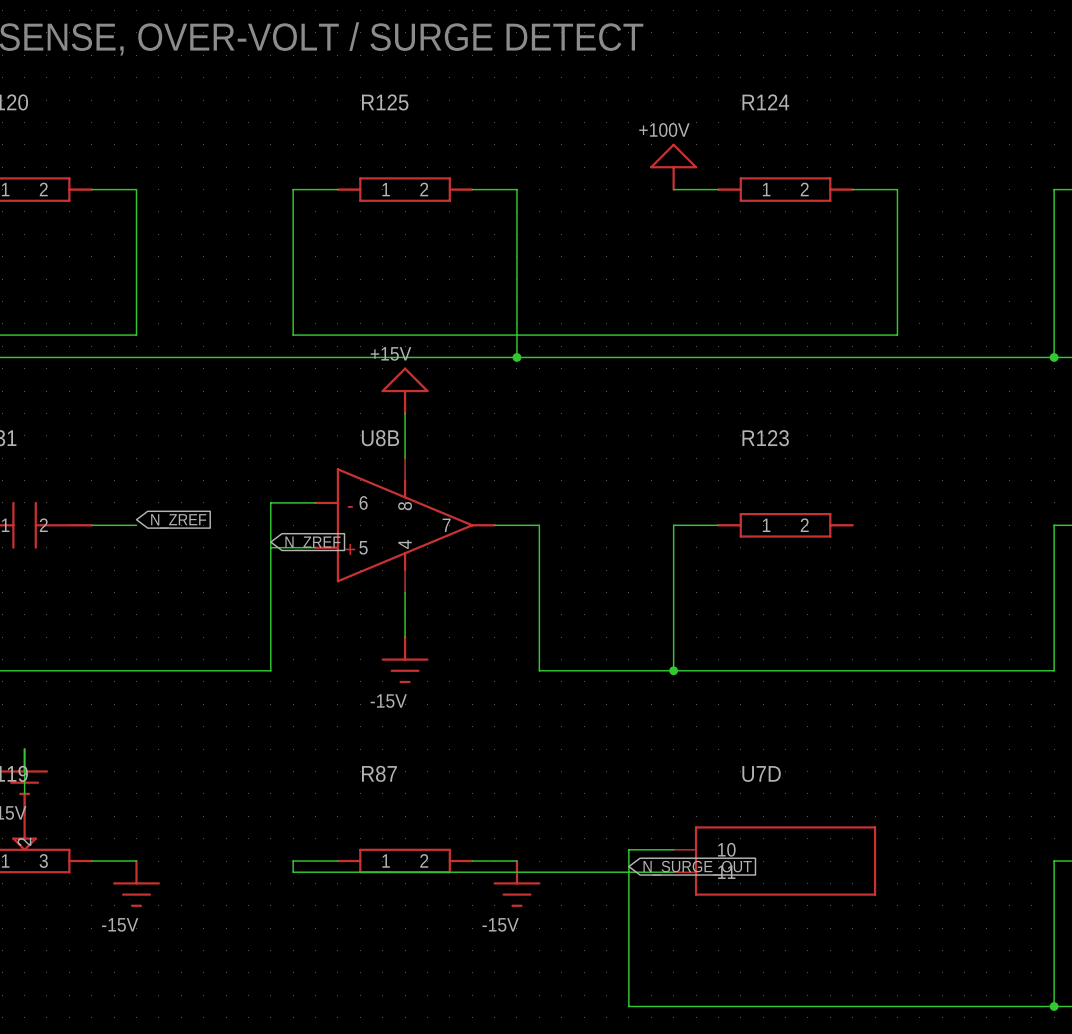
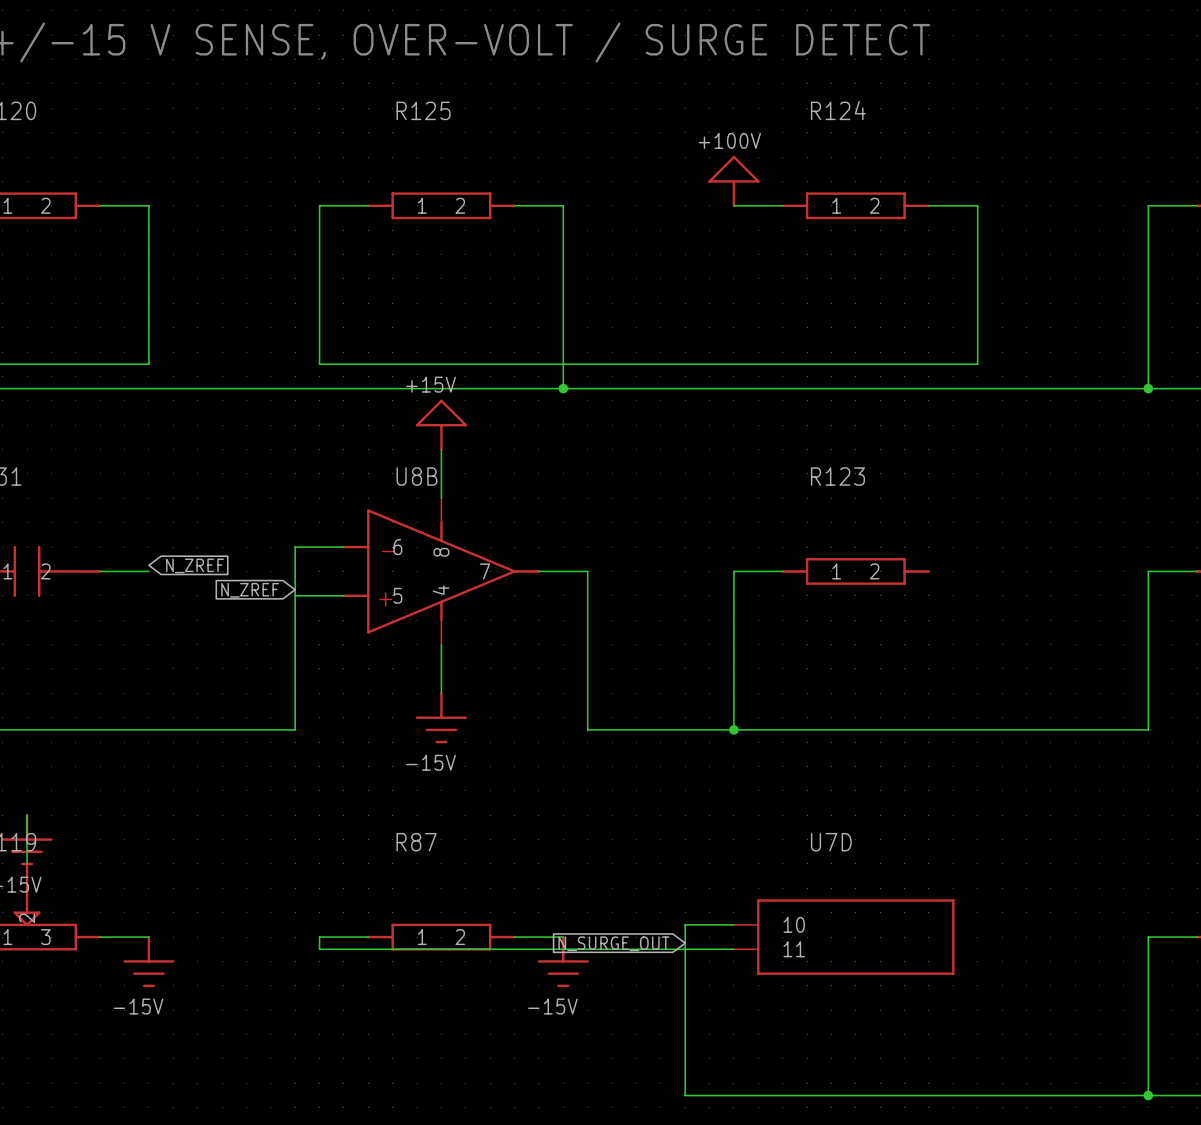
global label rotation: 0° (312, 543) -> 180° (250, 590)
global label position: N_ZREF (312, 543) -> N_ZREF (250, 590)
global label rotation: 0° (697, 868) -> 180° (614, 943)

